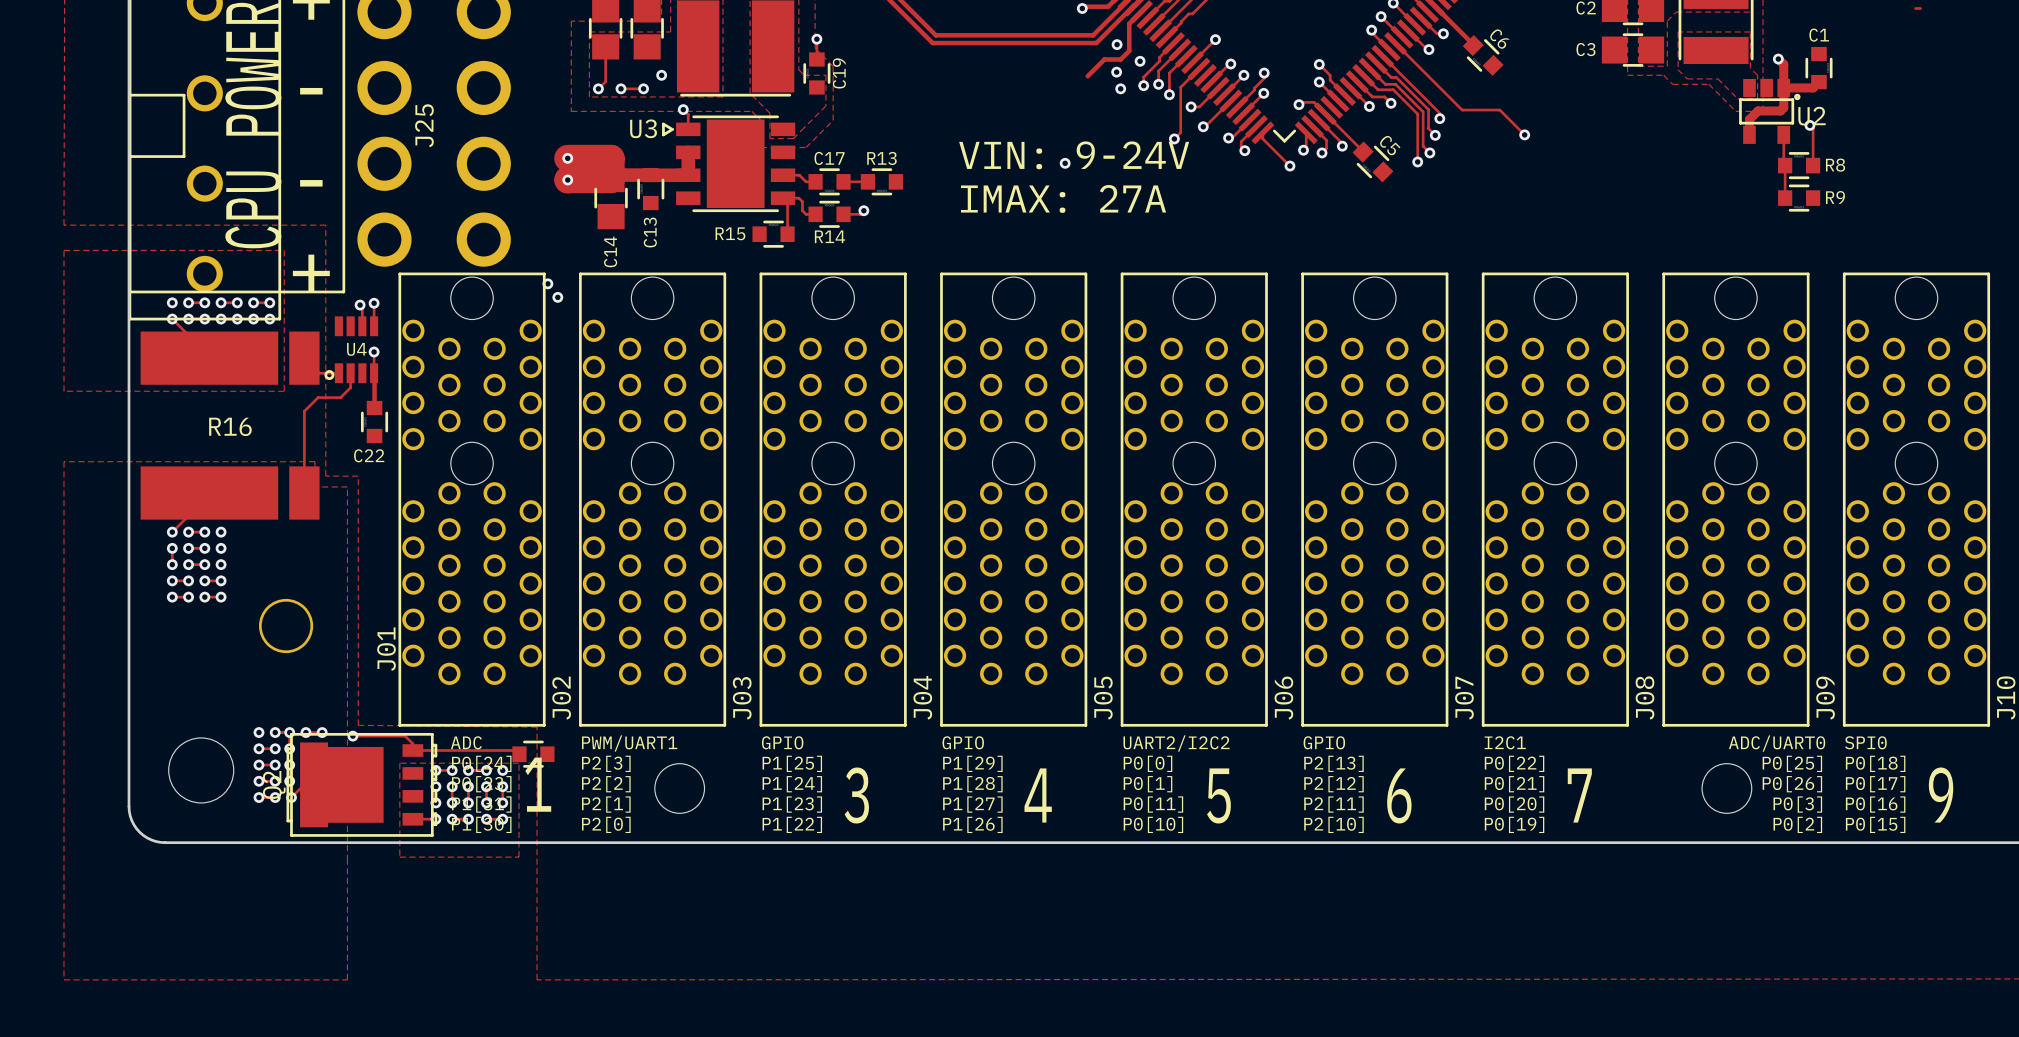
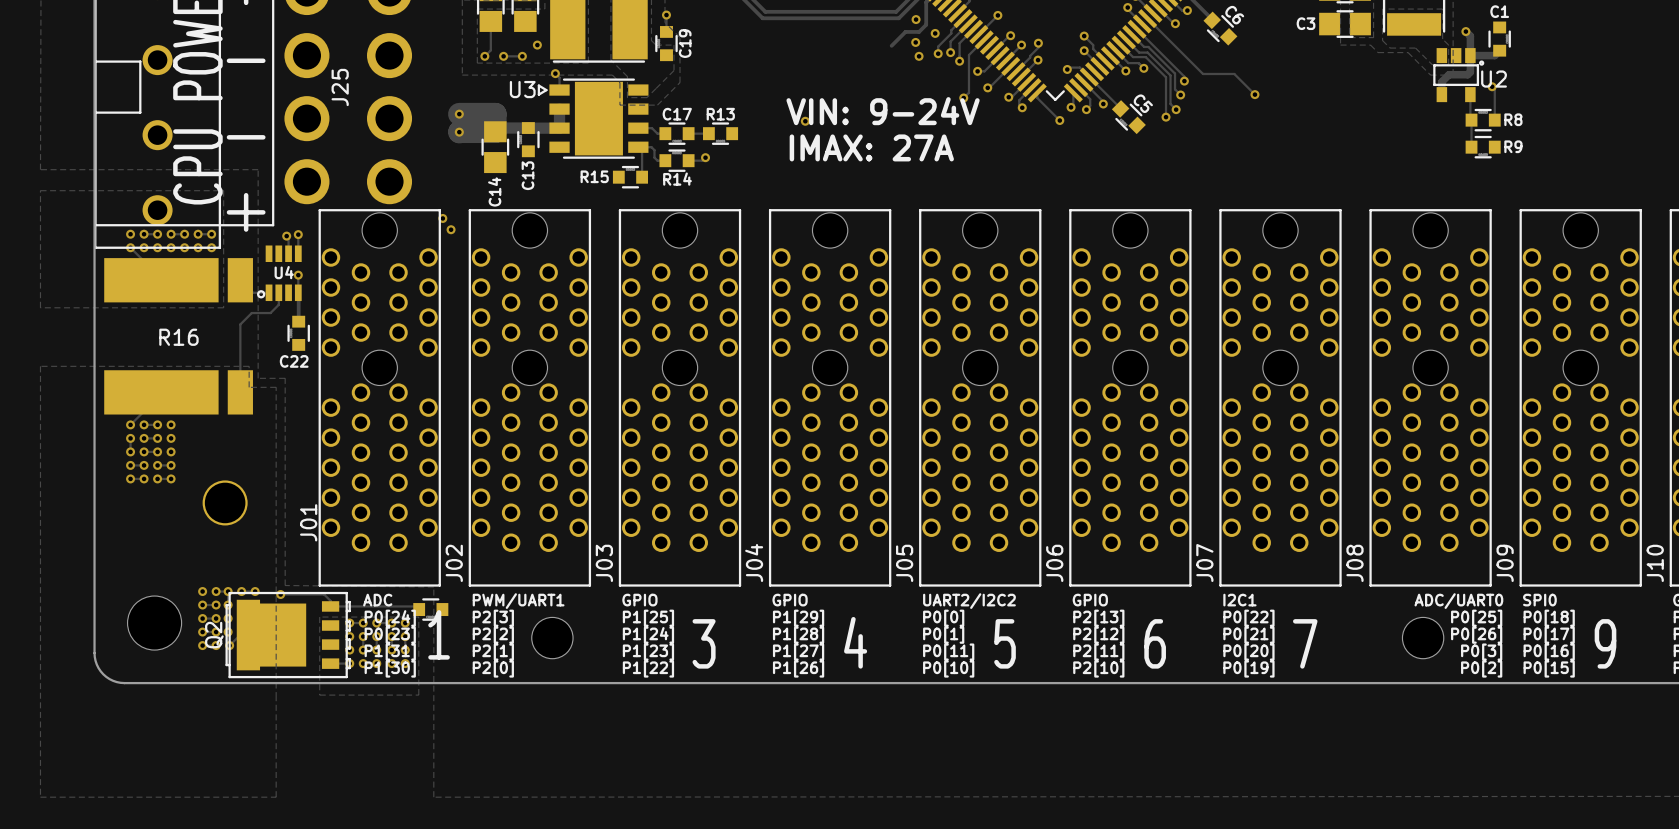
via position: (1065, 163) -> (805, 121)

